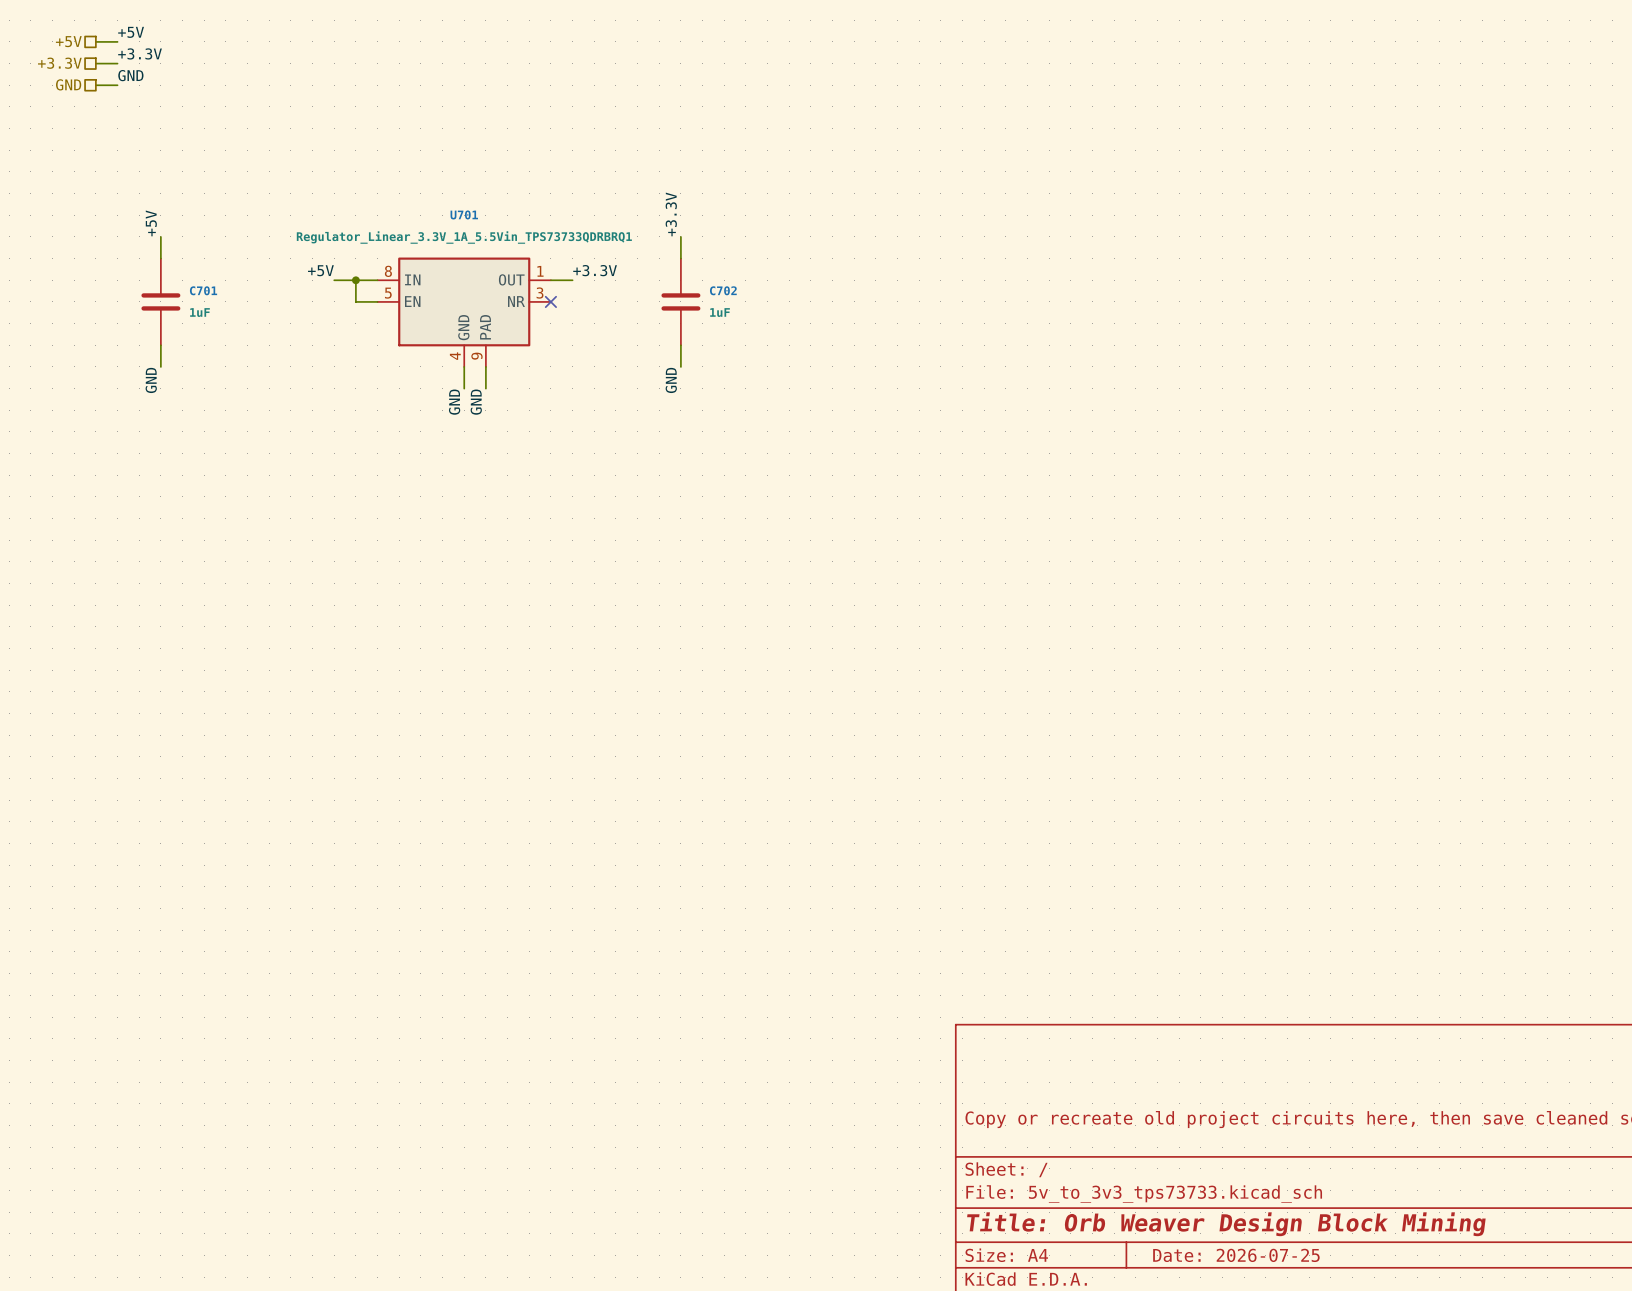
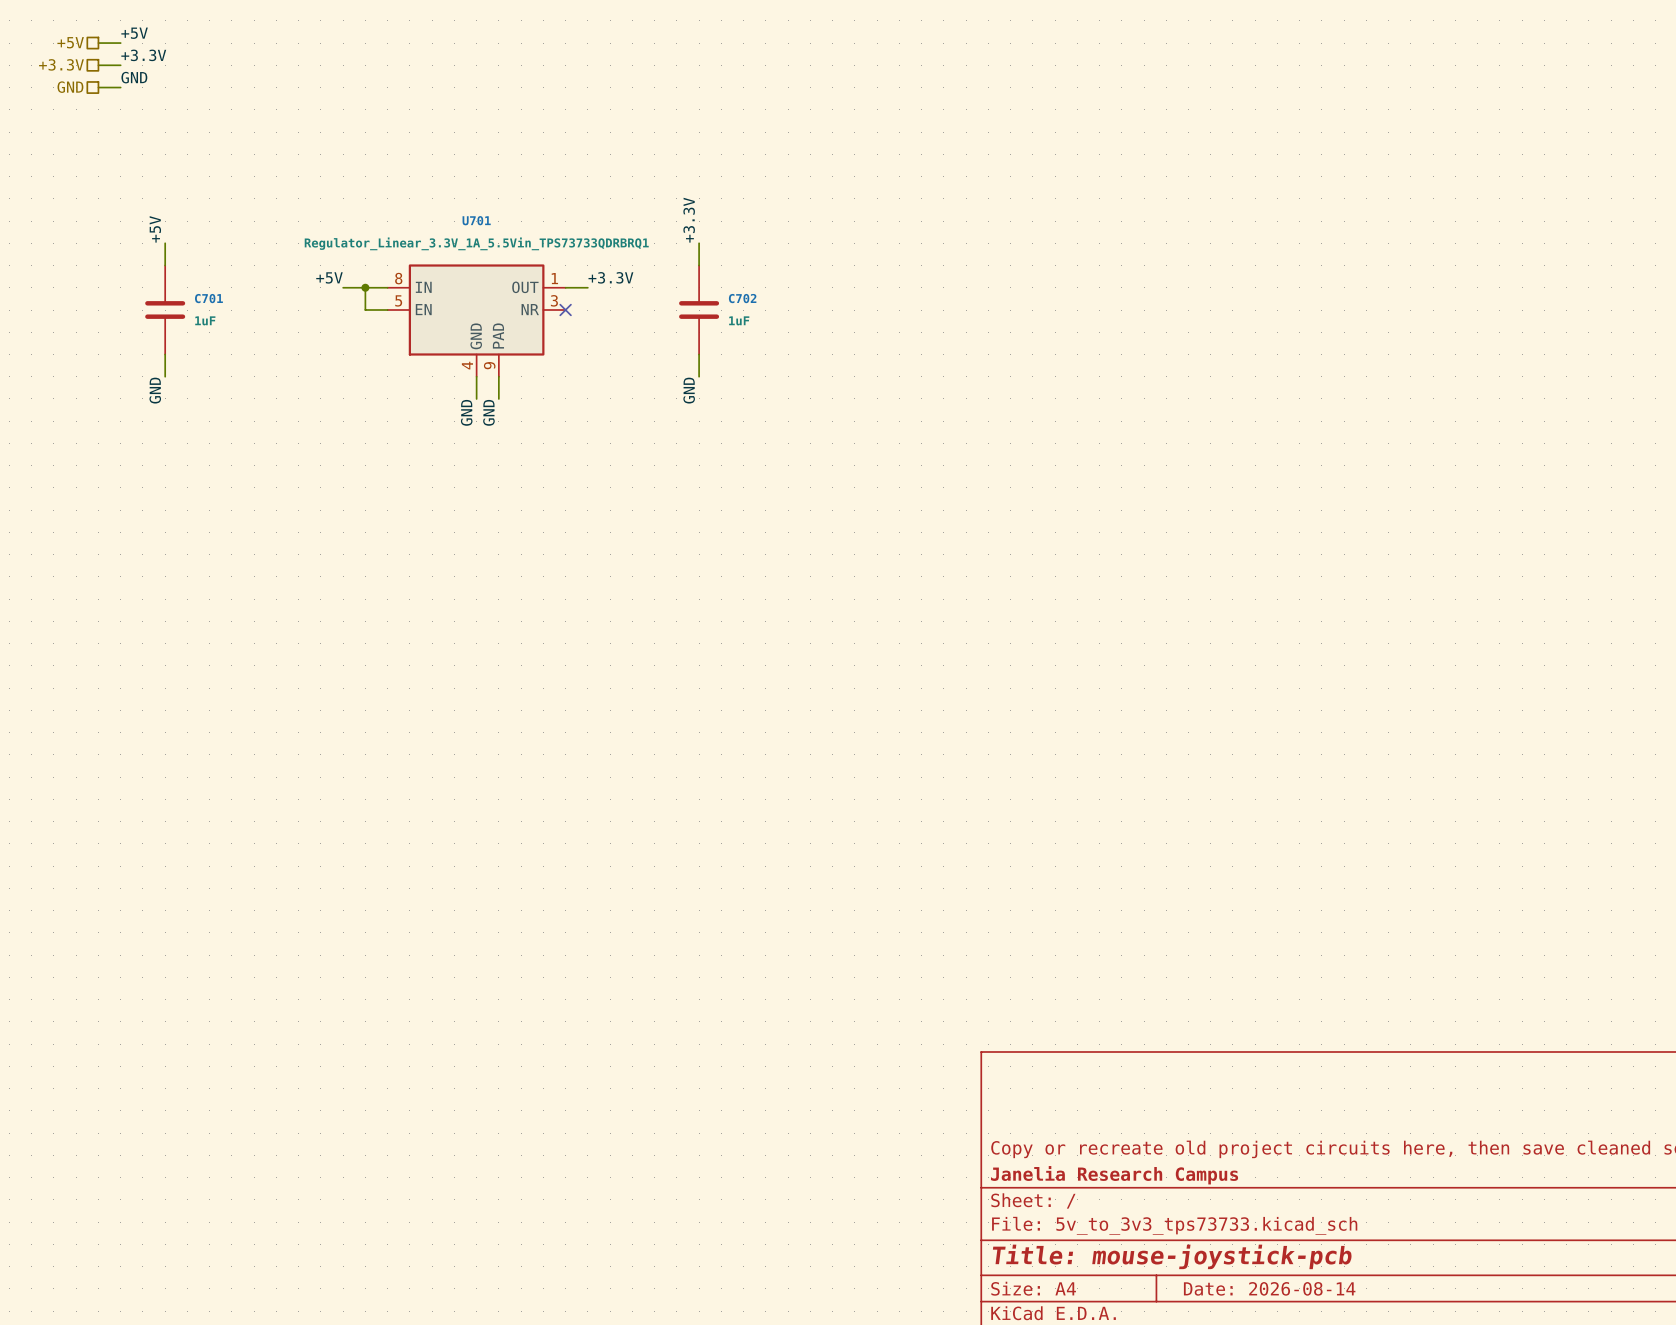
title block: none -> Janelia Research Campus (1114, 1175)
title block: Title: Orb Weaver Design Block Mining (1226, 1224) -> Title: mouse-joystick-pcb (1172, 1256)
title block: Date: 2026-07-25 (1236, 1255) -> Date: 2026-08-14 (1269, 1288)

